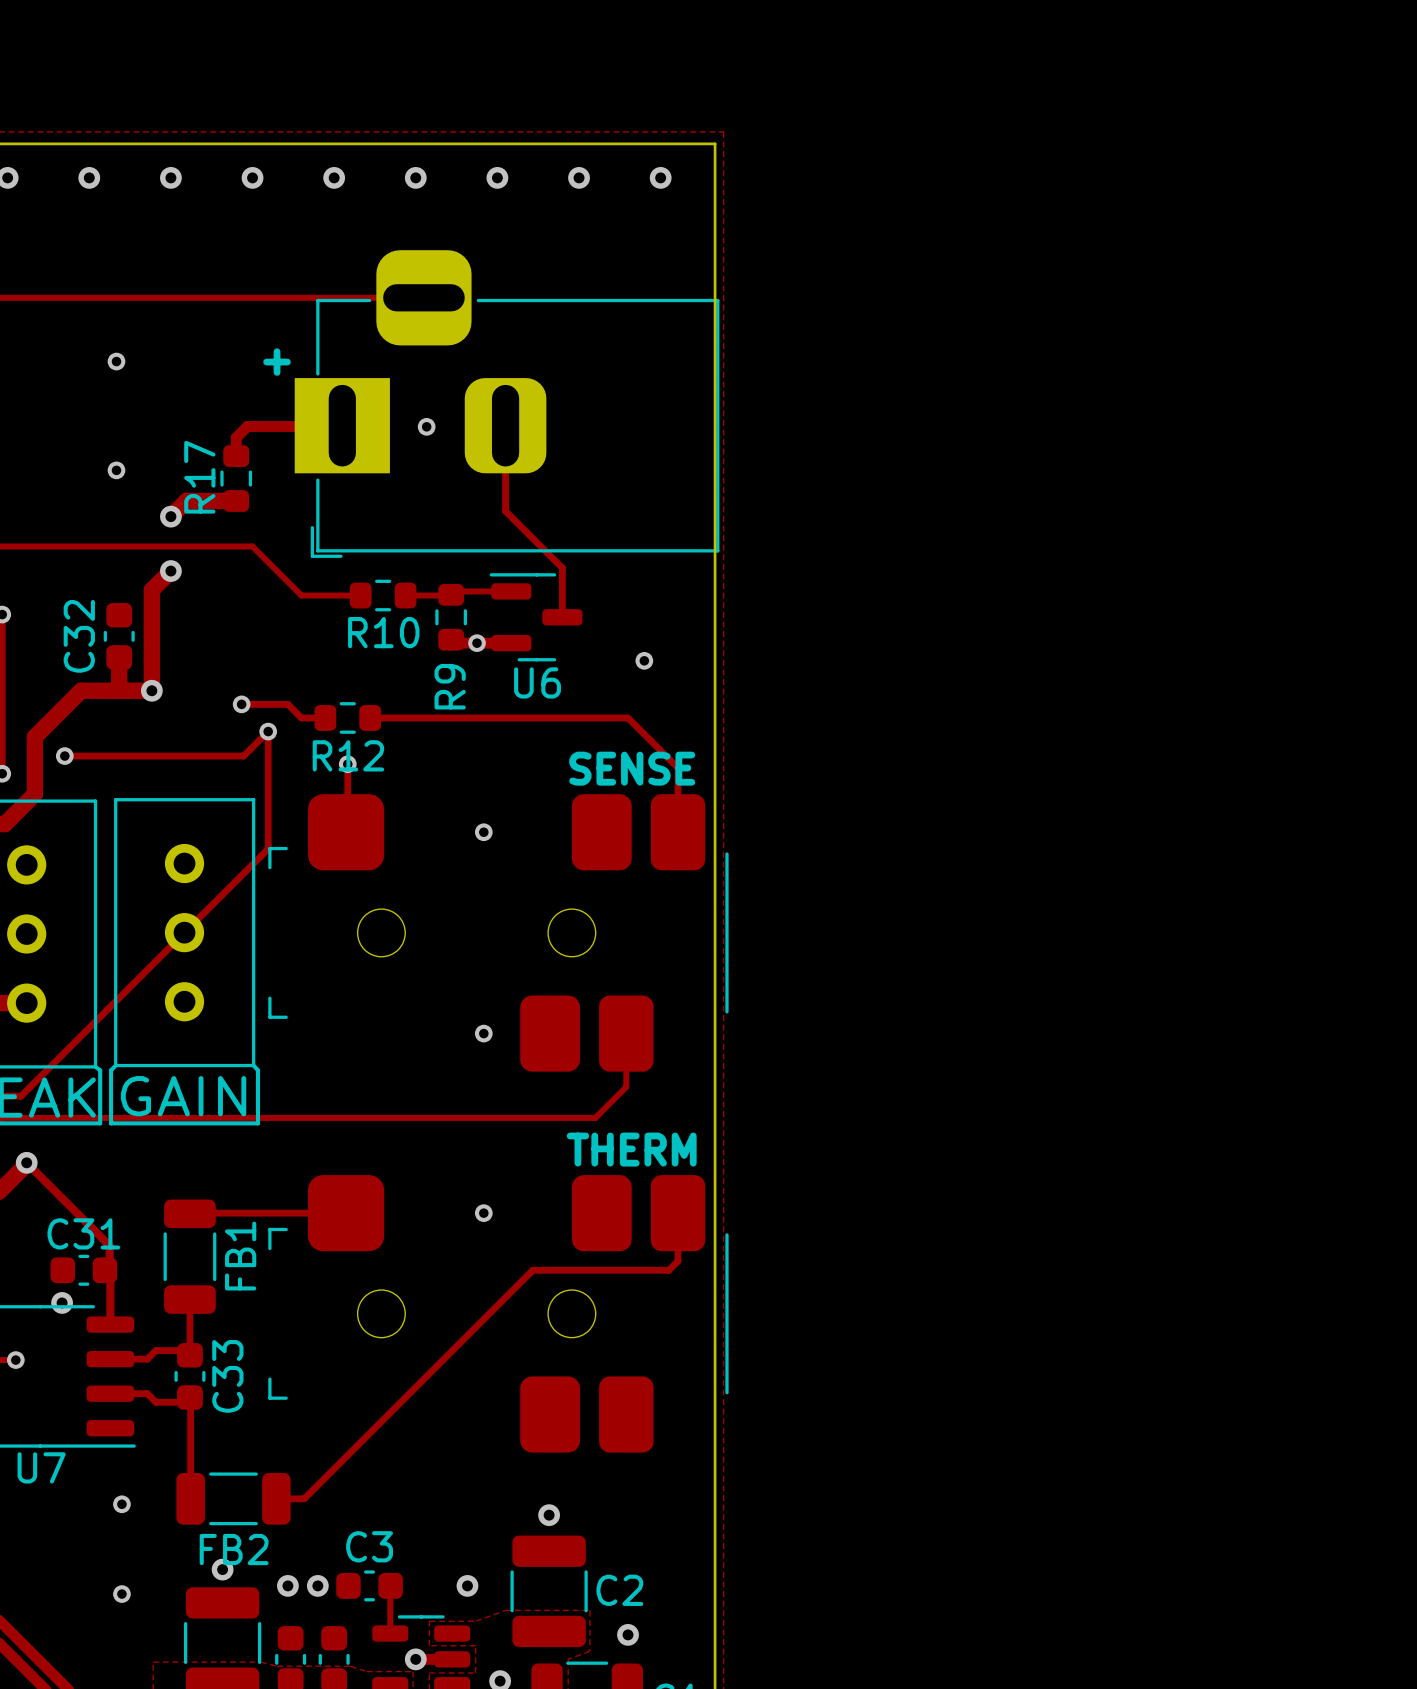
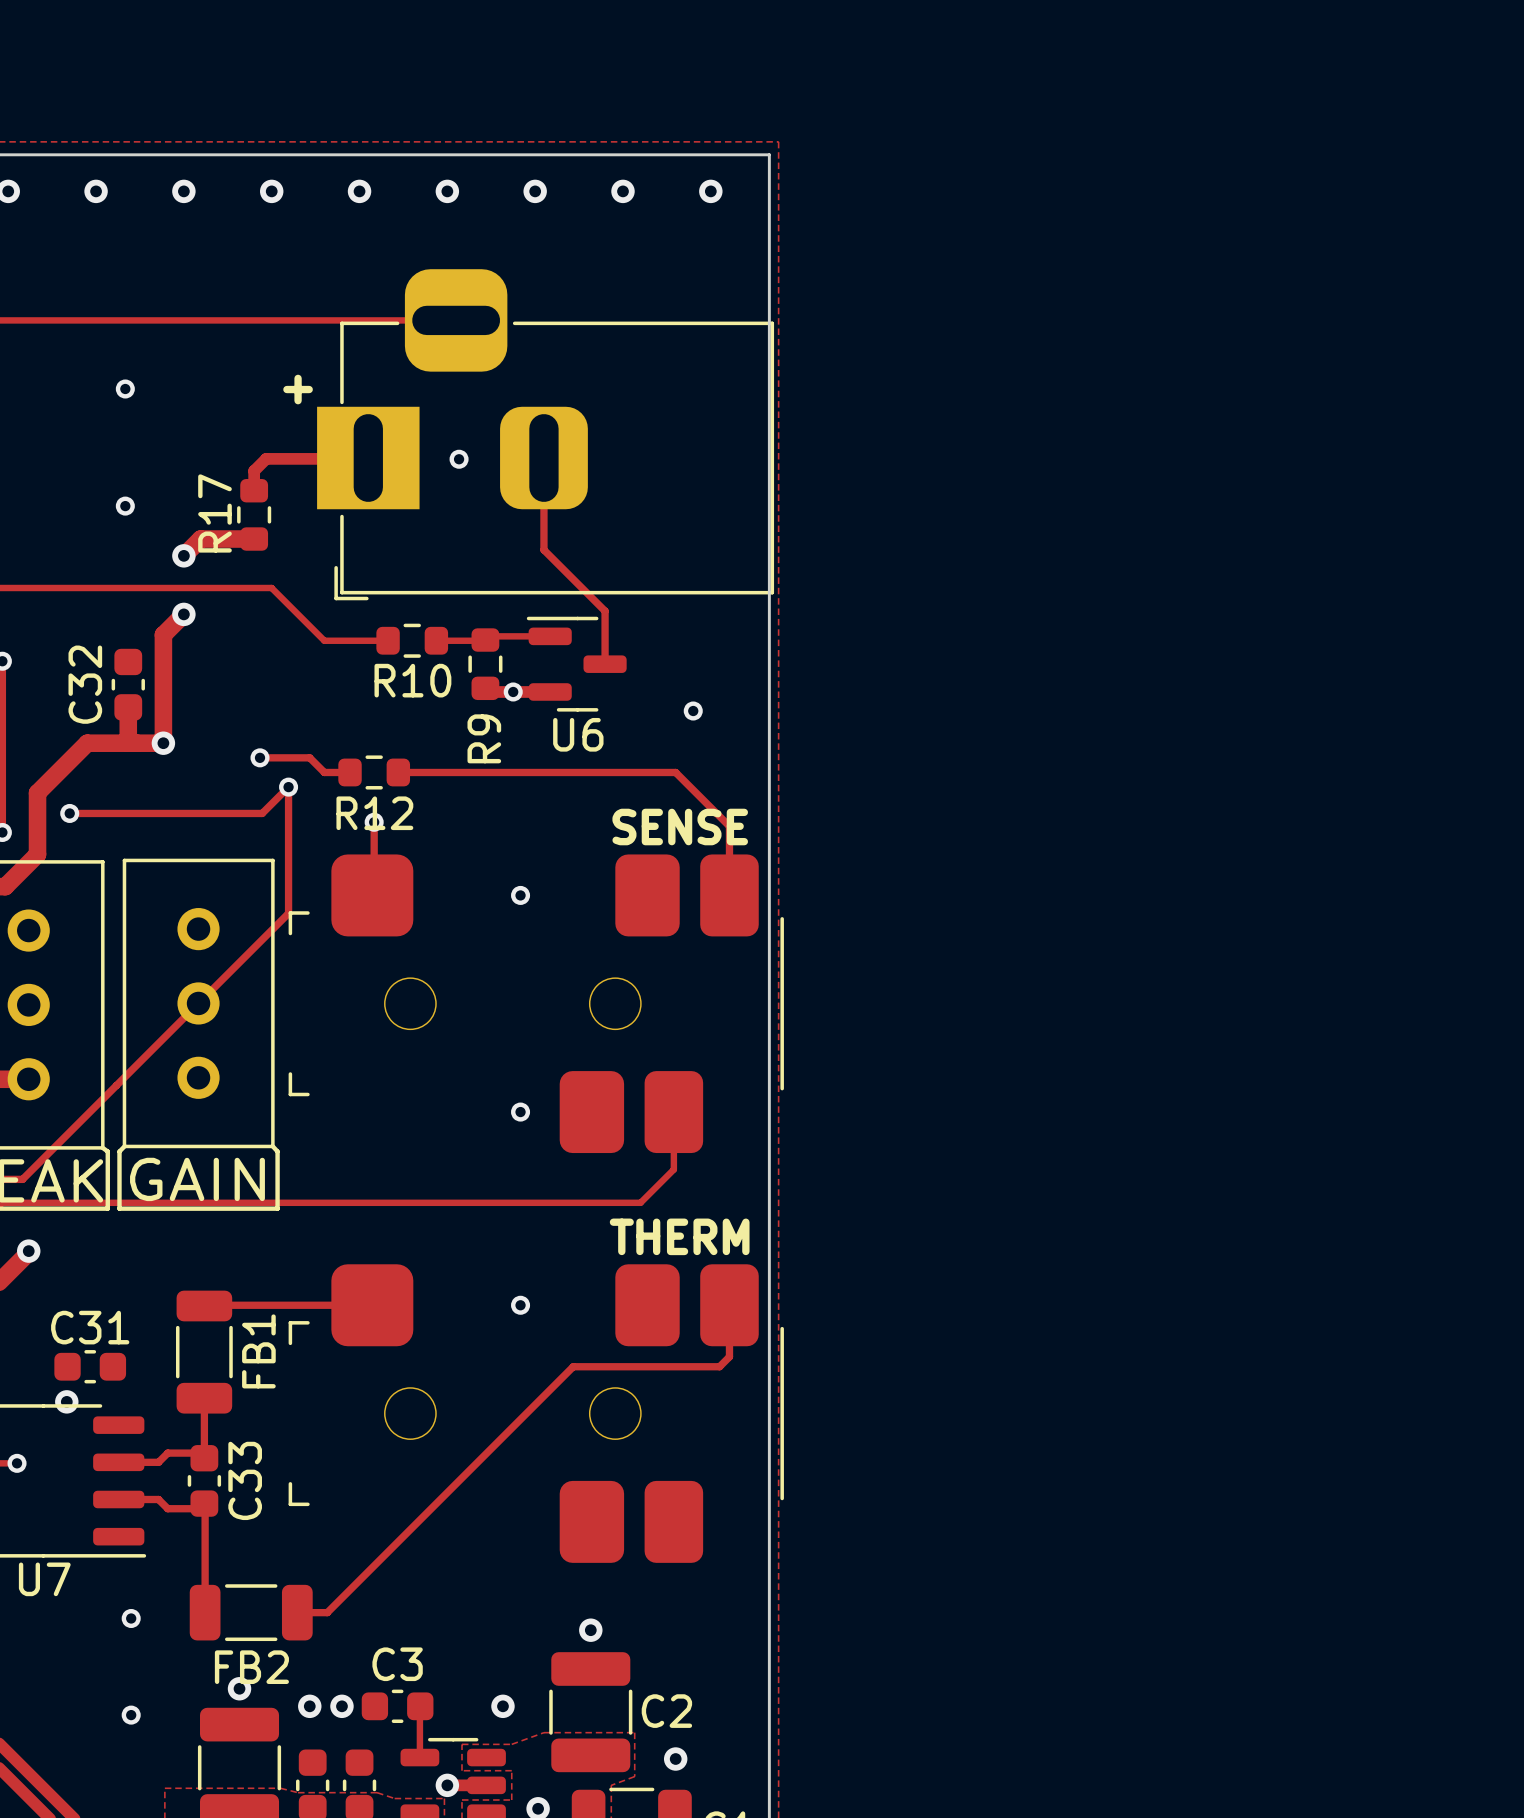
track: (26, 1162) (109, 1245) (109, 1270) -> none
track: (110, 1270) (110, 1324) -> none

